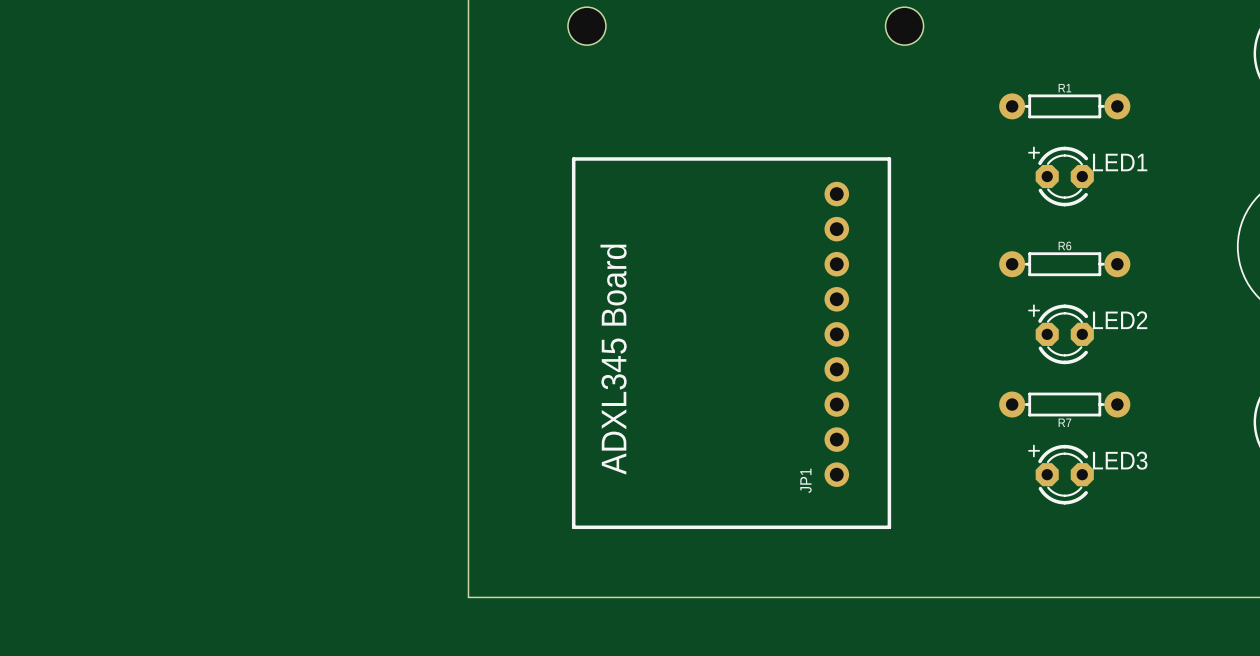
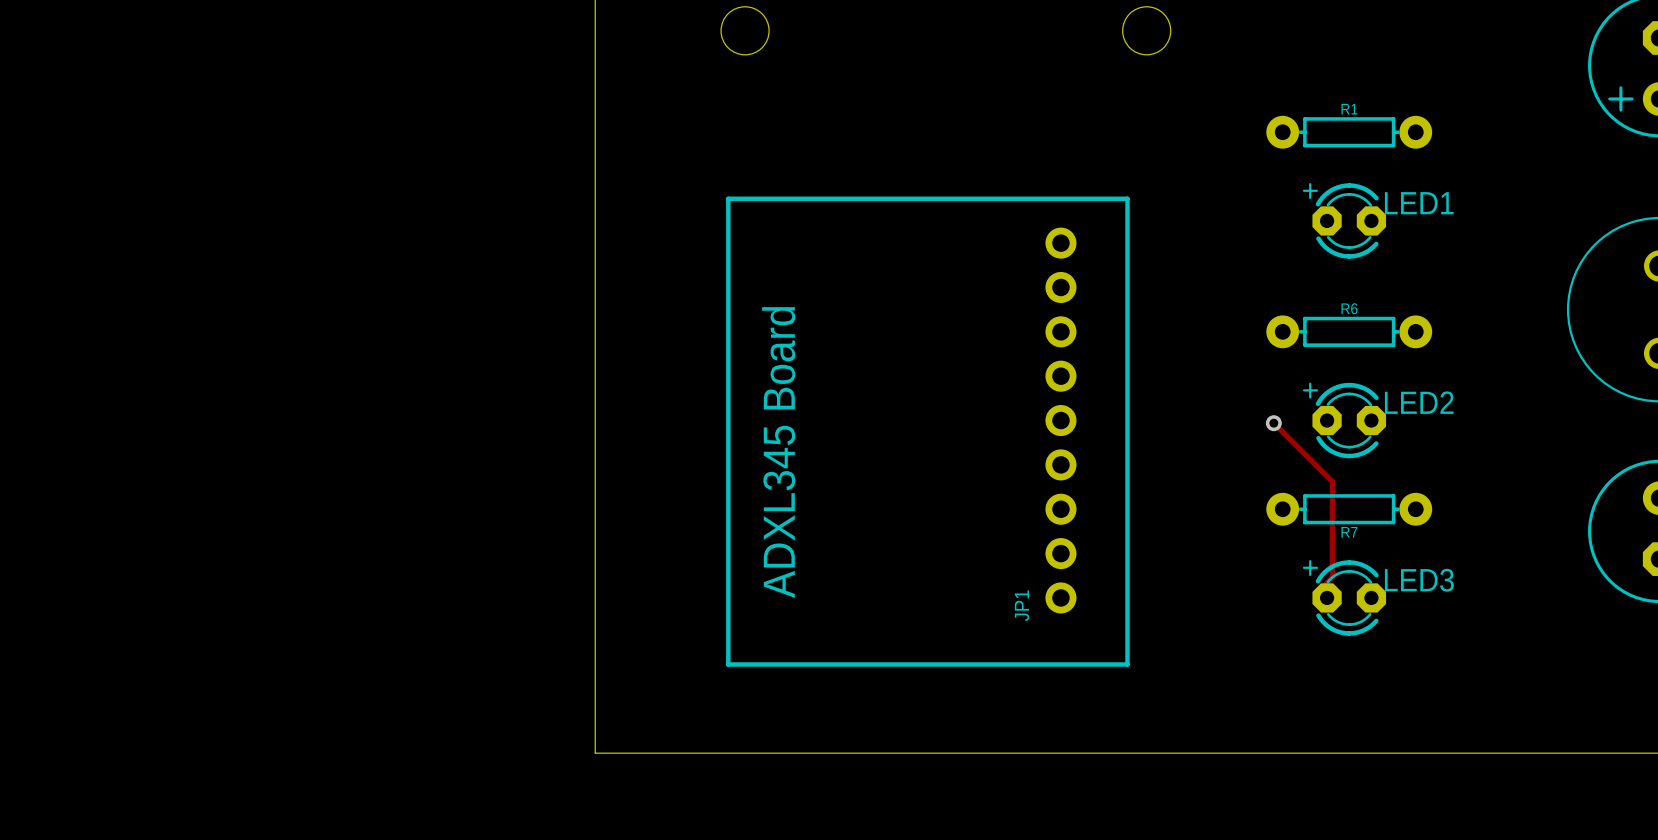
track: none -> (1273, 423) (1332, 481) (1332, 577) (1327, 582) (1327, 597)
via: none -> (1273, 423)

